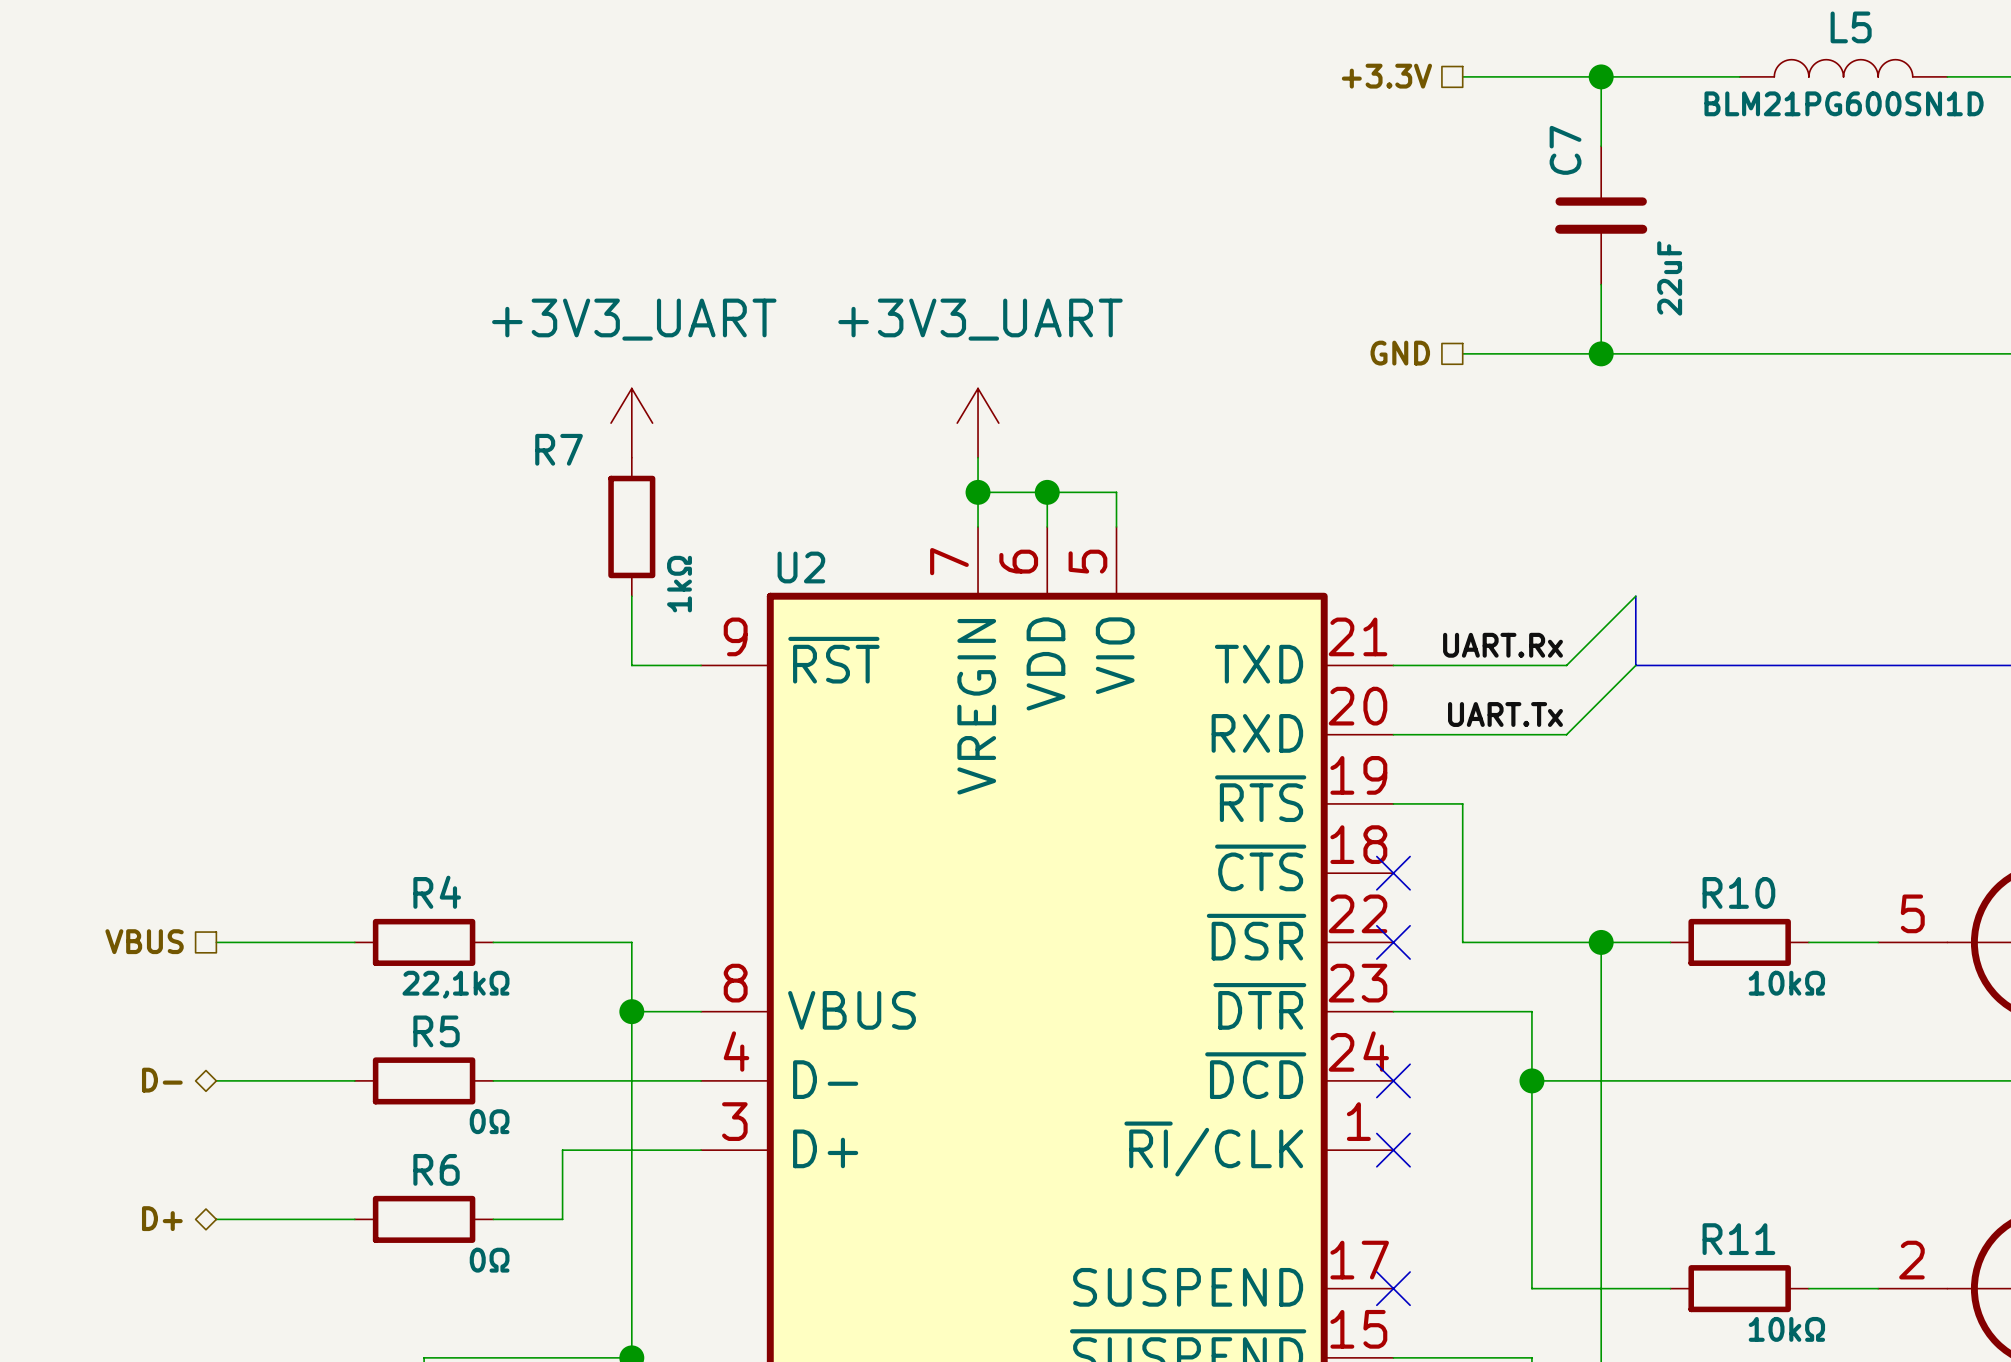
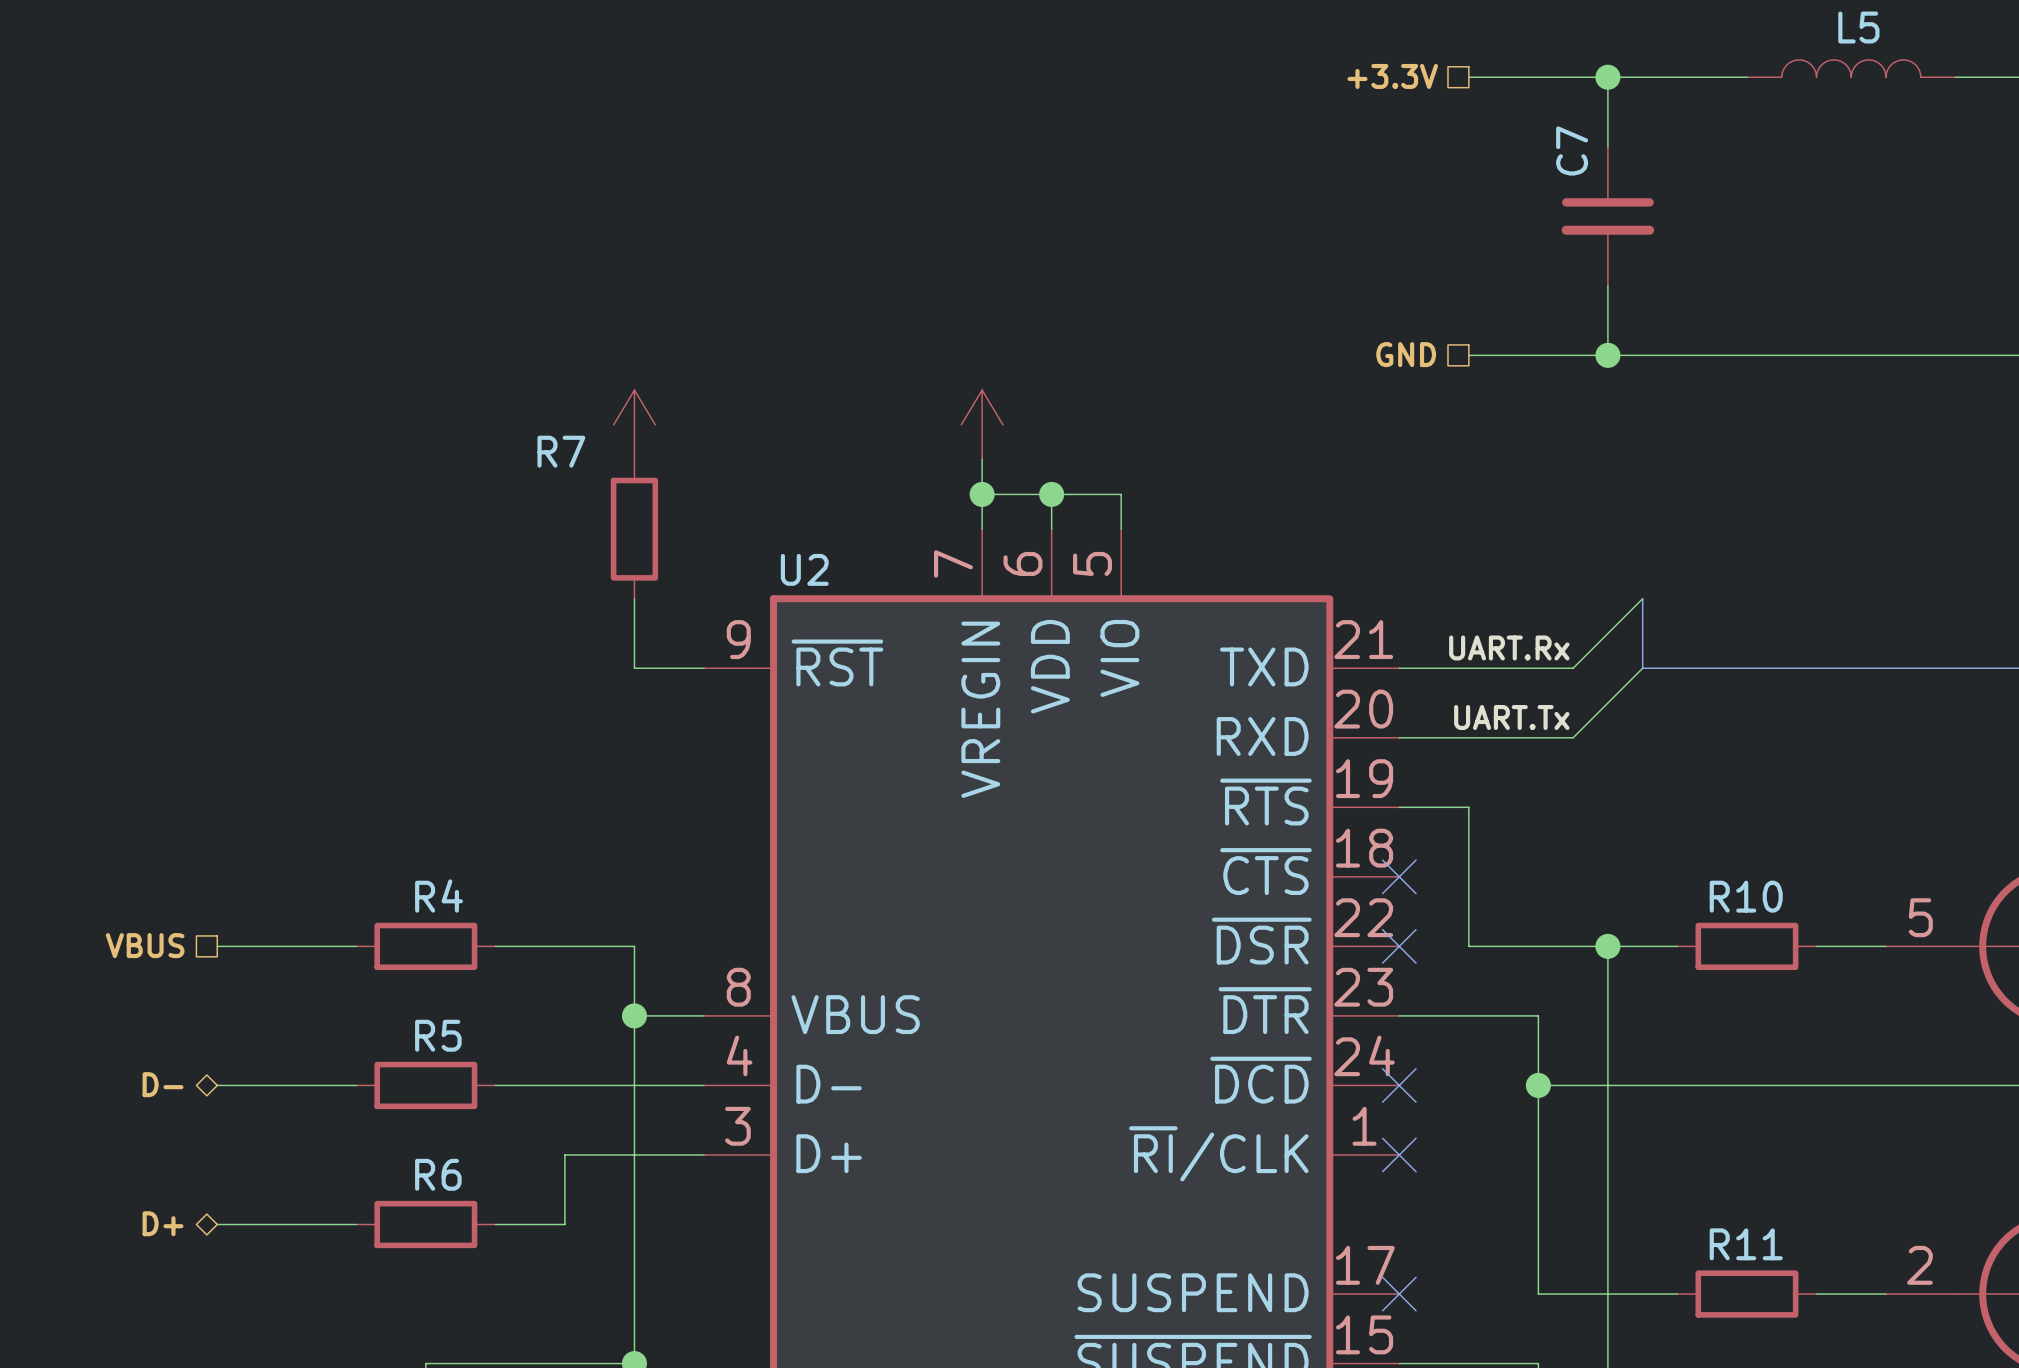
L5 value: BLM21PG600SN1D (1844, 103) -> none
C7 value: 22uF (1669, 278) -> none
power symbol text: +3V3_UART (634, 319) -> none
power symbol text: +3V3_UART (980, 319) -> none
R7 value: 1kΩ (679, 584) -> none
R10 value: 10kΩ (1786, 983) -> none
R4 value: 22,1kΩ (455, 984) -> none
R5 value: 0Ω (489, 1121) -> none
R6 value: 0Ω (489, 1260) -> none
R11 value: 10kΩ (1786, 1329) -> none

